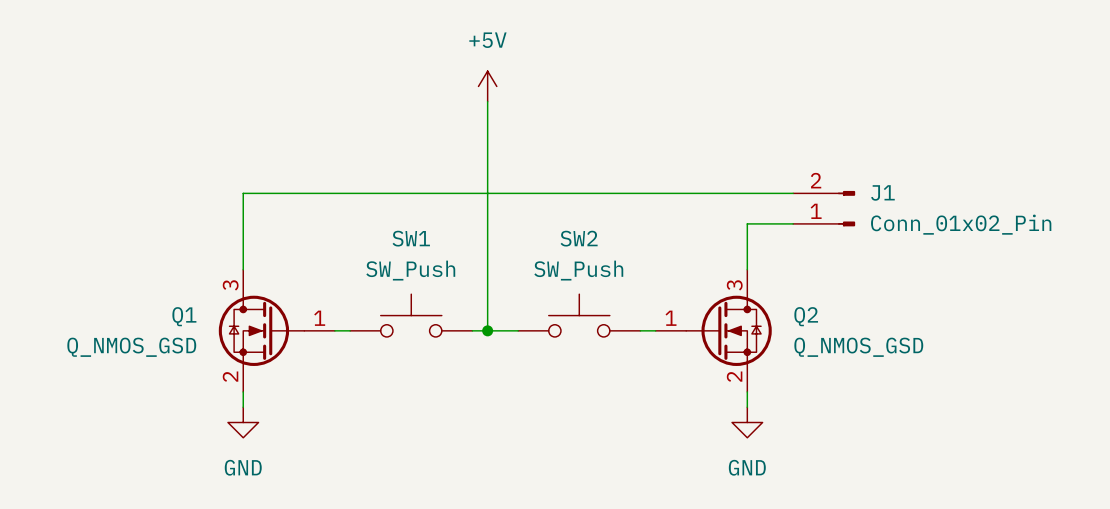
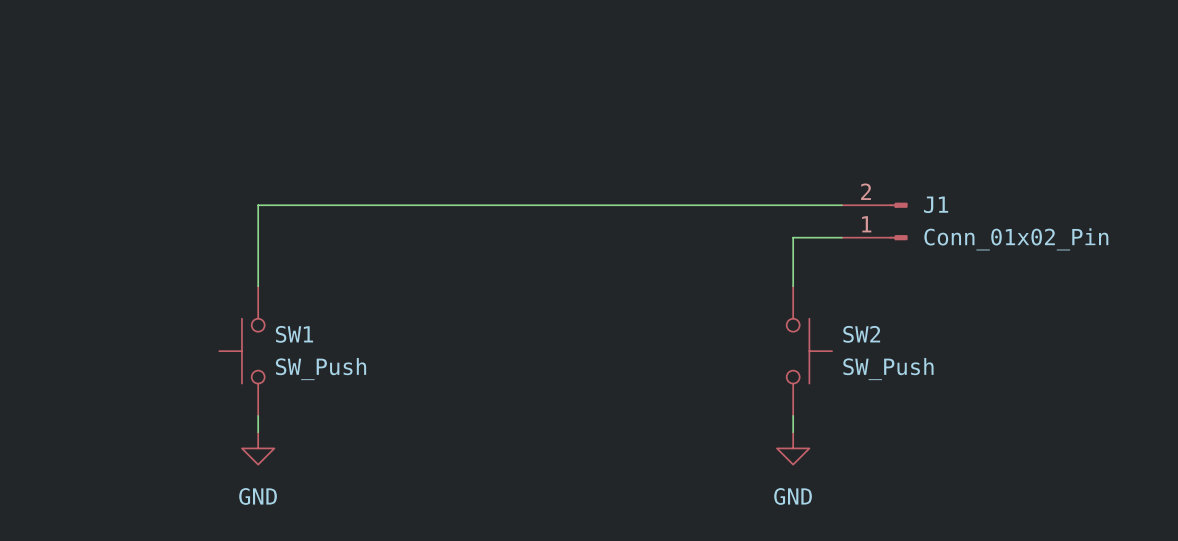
power symbol: +5V (487, 86) -> none
wire: (487, 101) (487, 330) -> none
SW1 name position: SW1 (411, 238) -> SW1 (294, 334)
SW1 value position: SW_Push (410, 270) -> SW_Push (321, 369)
SW2 value position: SW_Push (578, 270) -> SW_Push (888, 369)
SW1 rotation: 0° (411, 315) -> 90° counterclockwise (241, 351)
SW1 position: (411, 315) -> (241, 351)
SW2 rotation: 0° (579, 315) -> 90° clockwise (809, 351)
SW2 position: (579, 315) -> (809, 351)
Q1: Q_NMOS_GSD (276, 330) -> none
wire: (334, 330) (350, 330) -> none
wire: (472, 330) (518, 330) -> none
junction: (487, 330) -> none
wire: (640, 330) (655, 330) -> none
Q2: Q_NMOS_GSD (713, 330) -> none

